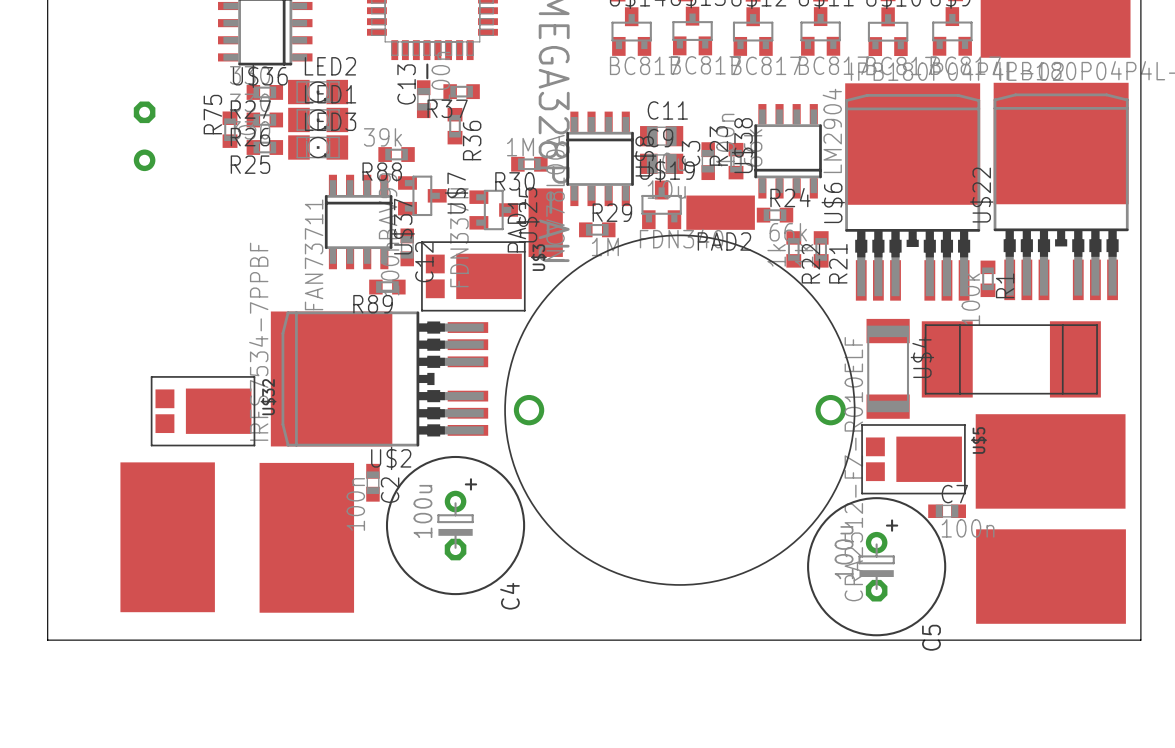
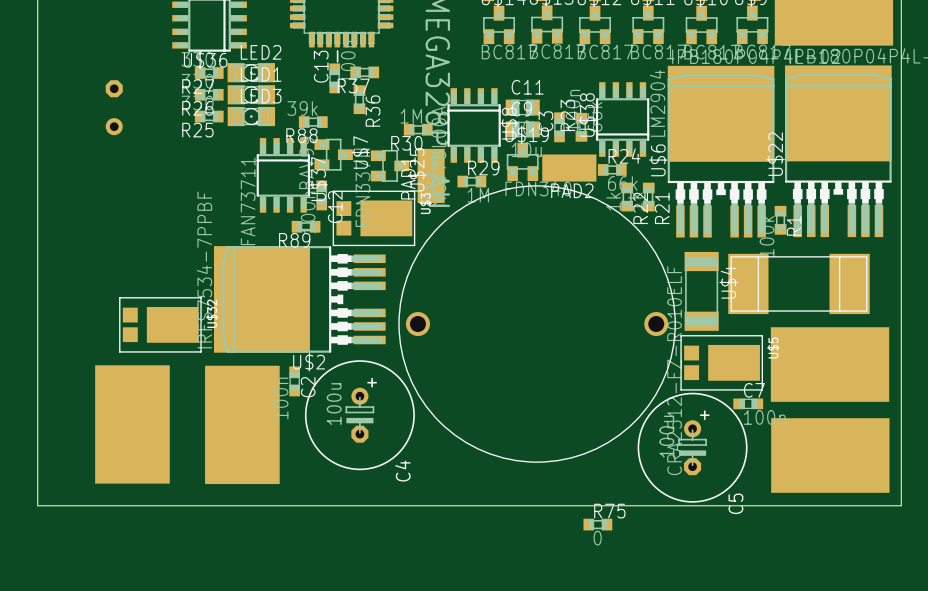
R75 rotation: 0° (230, 129) -> 90° clockwise (597, 524)
R75 position: (230, 129) -> (597, 524)

